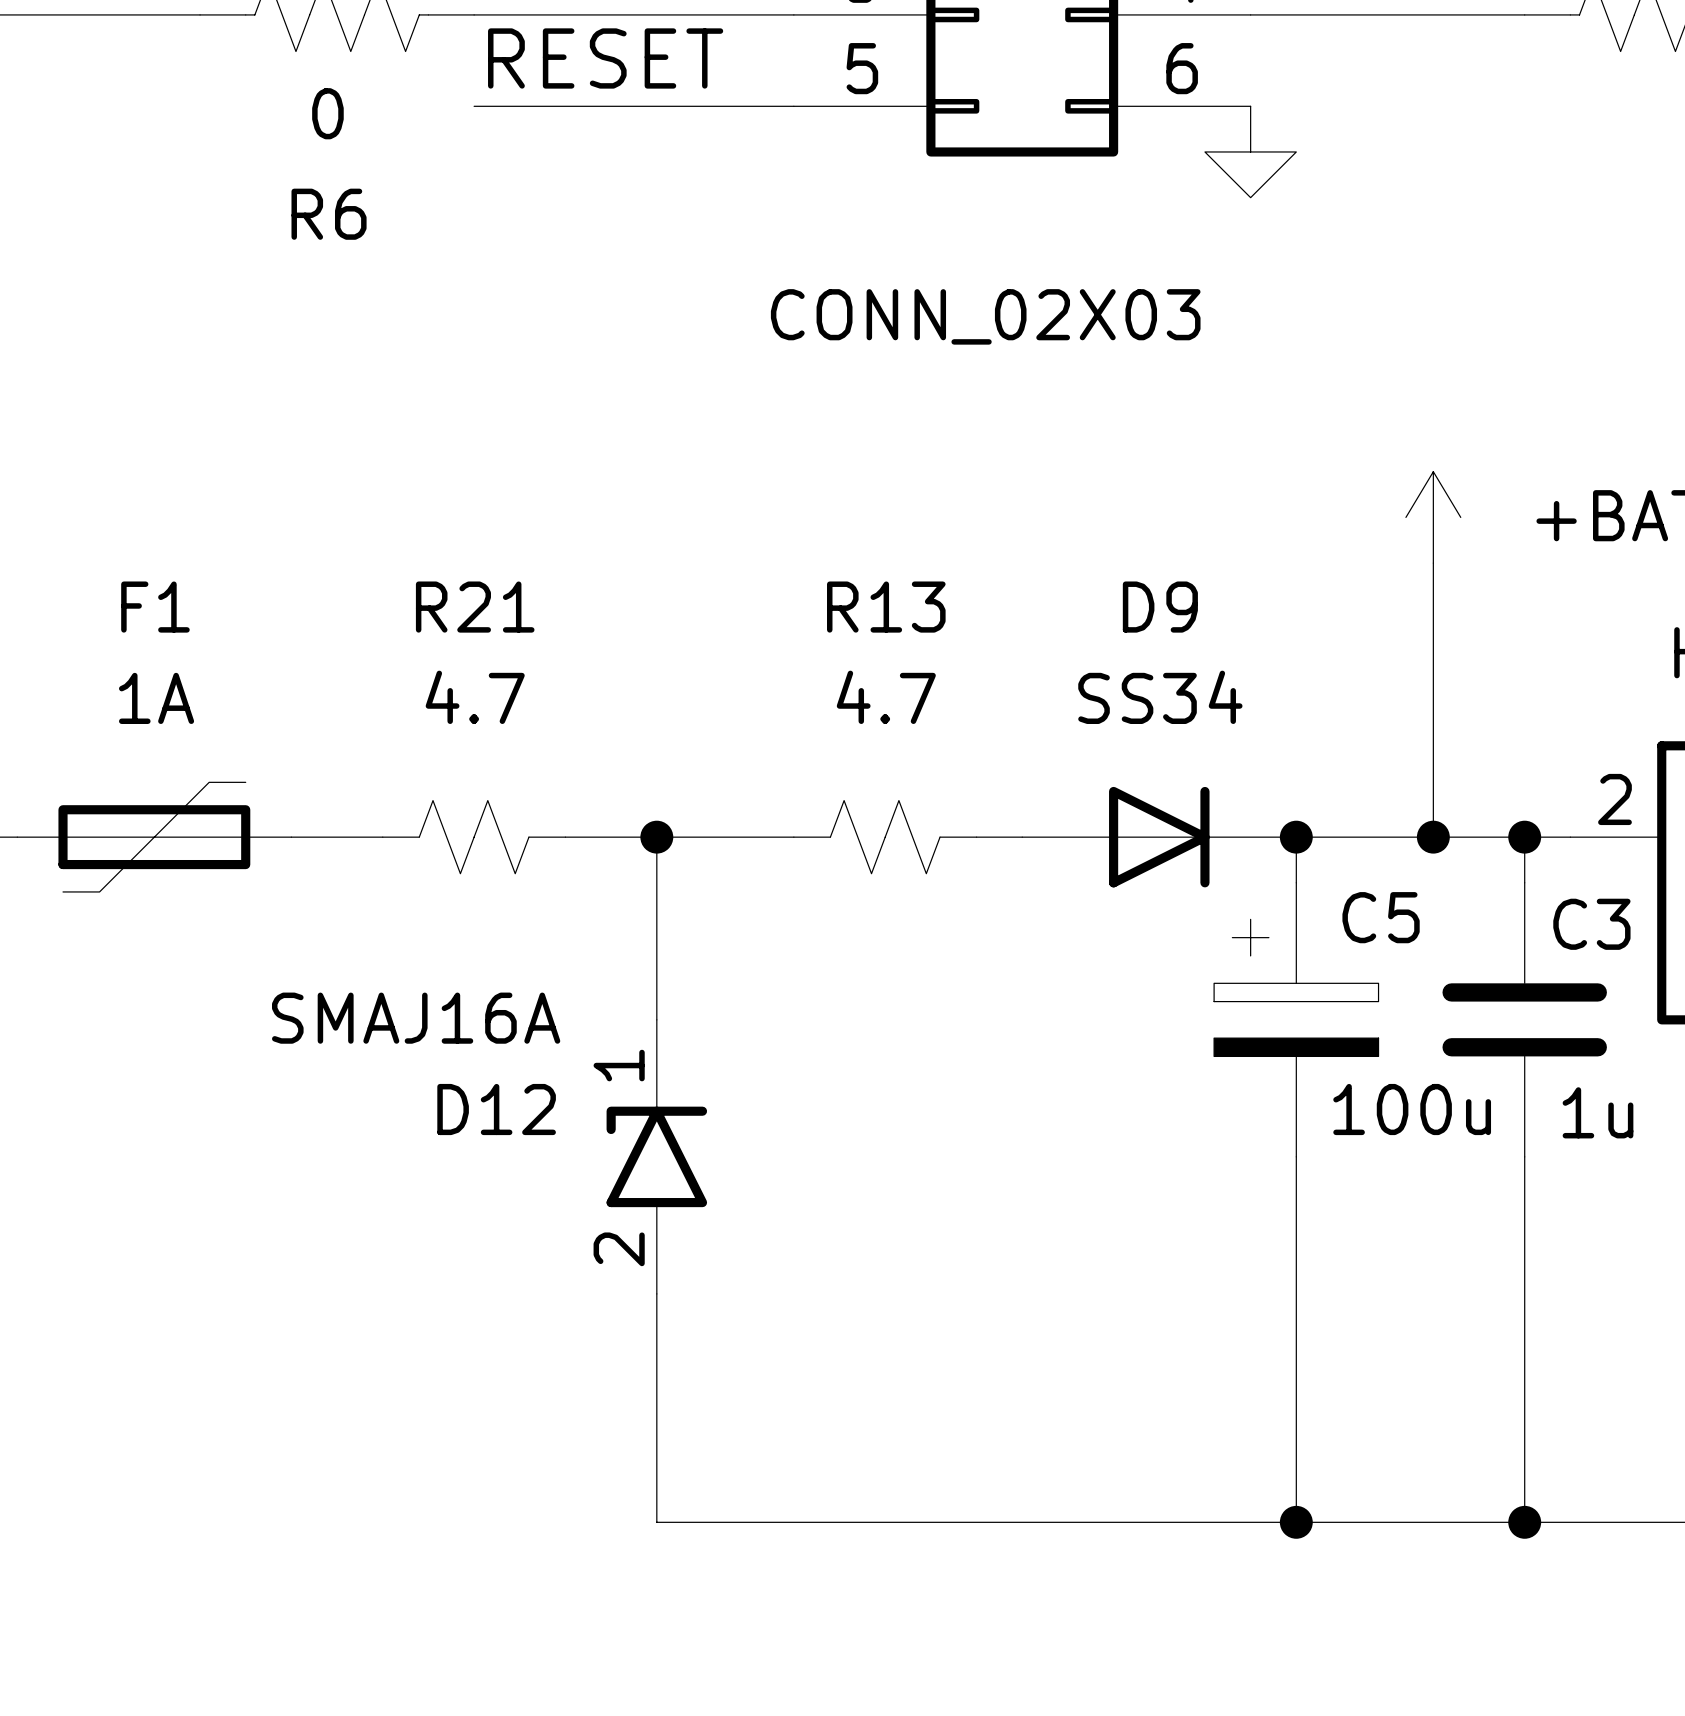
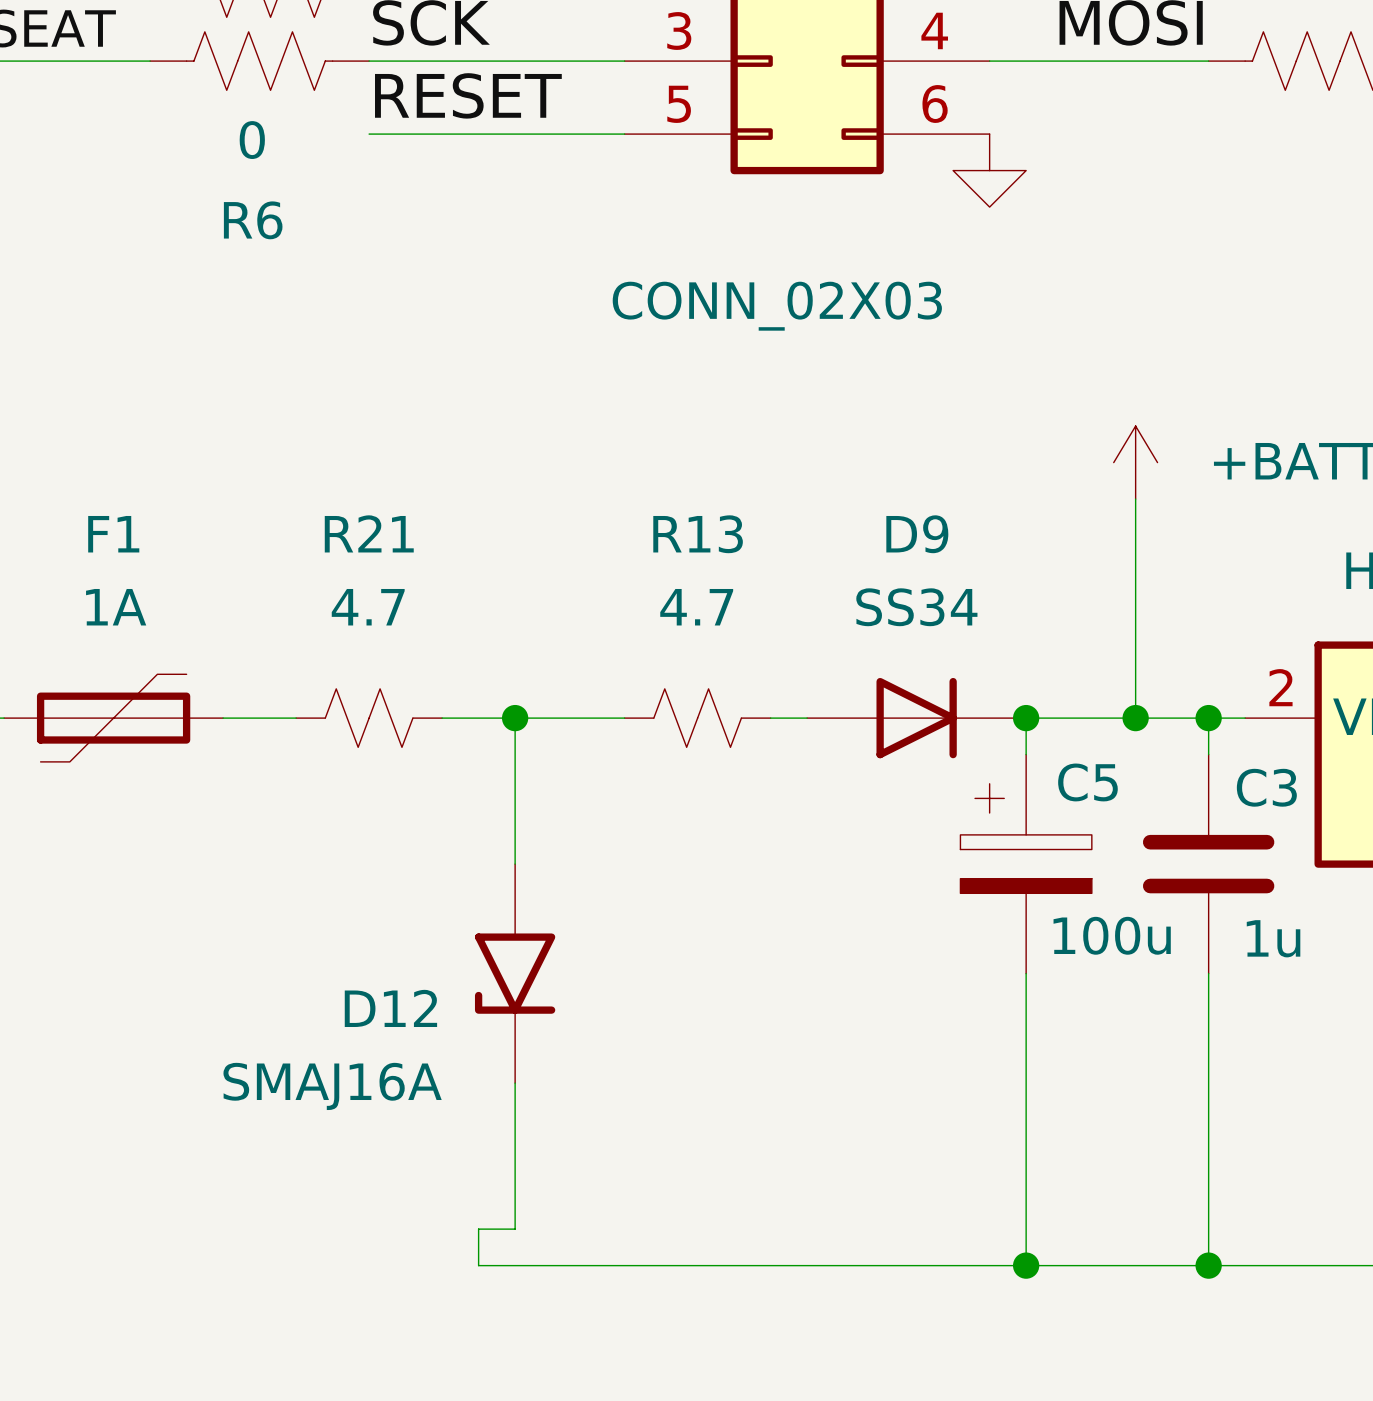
D12 value position: SMAJ16A (416, 1018) -> SMAJ16A (332, 1086)
D12 symbol: [606, 1019, 708, 1294] -> [474, 864, 556, 1084]
D12 name position: D12 (496, 1109) -> D12 (390, 1008)
wire: (656, 1476) (656, 1522) -> (515, 1229) (478, 1229) (478, 1265) (515, 1265)

